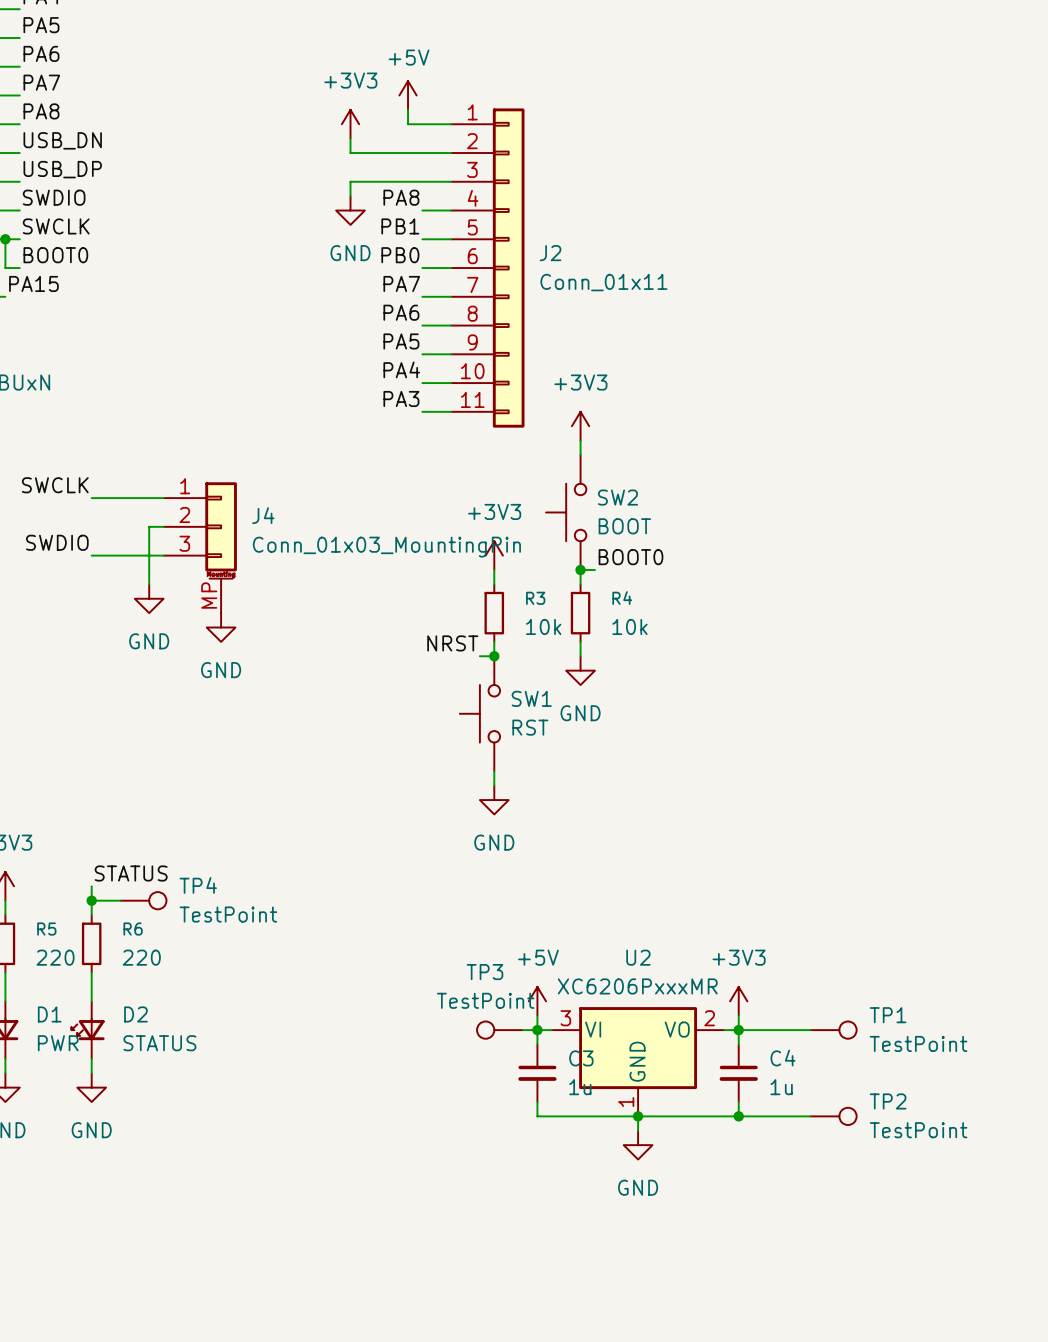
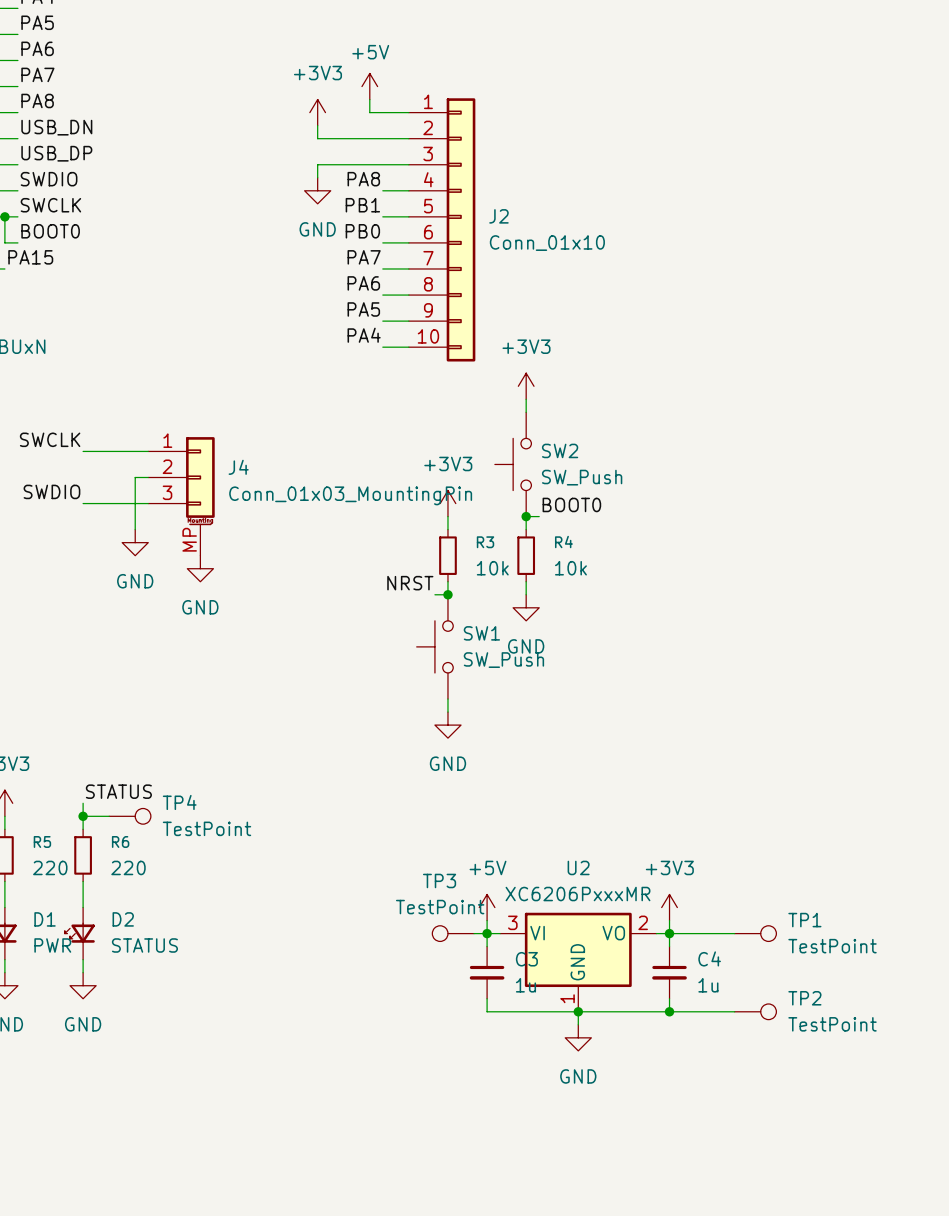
J2 symbol: [451, 108, 525, 428] -> [408, 98, 476, 362]
J2 value: Conn_01x11 (603, 282) -> Conn_01x10 (547, 243)
label: PA3 (401, 398) -> none
wire: (422, 411) (451, 411) -> none
SW2 value: BOOT (624, 526) -> SW_Push (582, 477)
SW1 value: RST (530, 727) -> SW_Push (503, 660)

